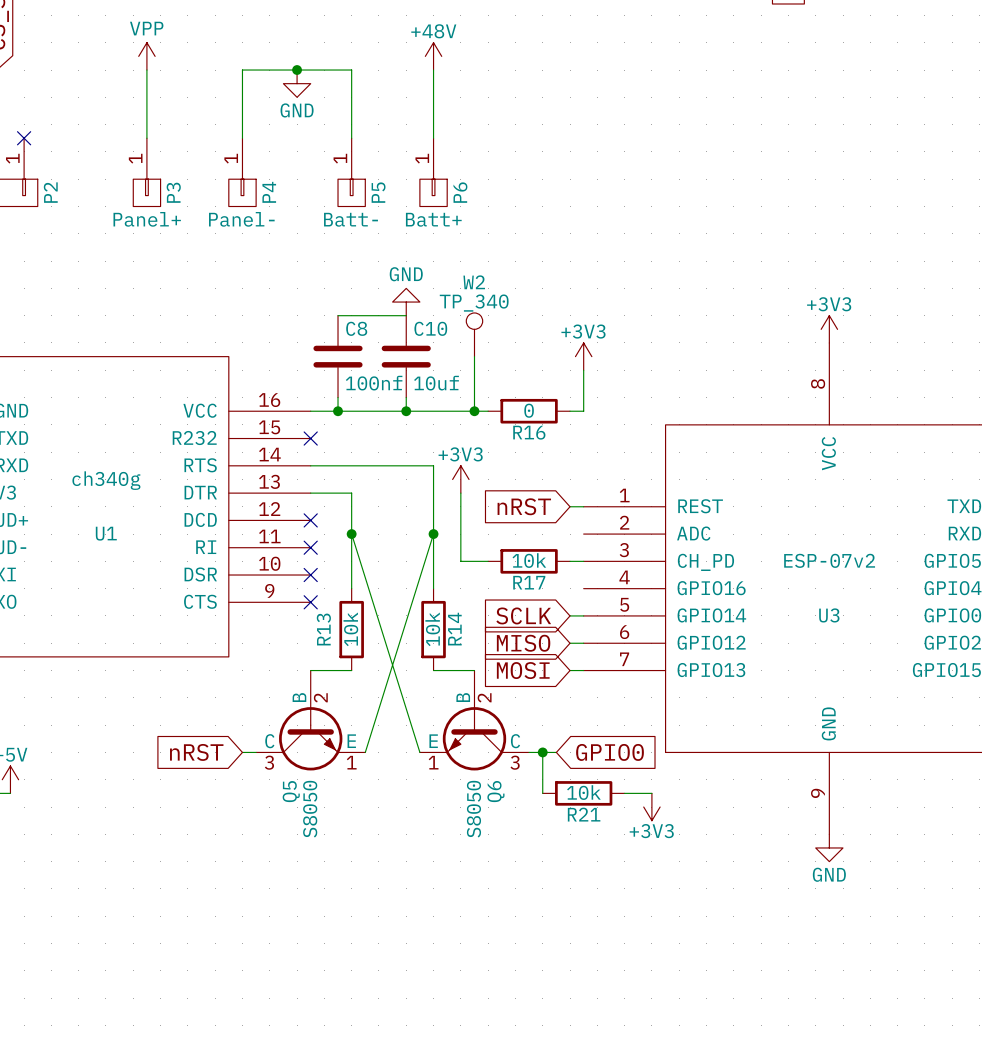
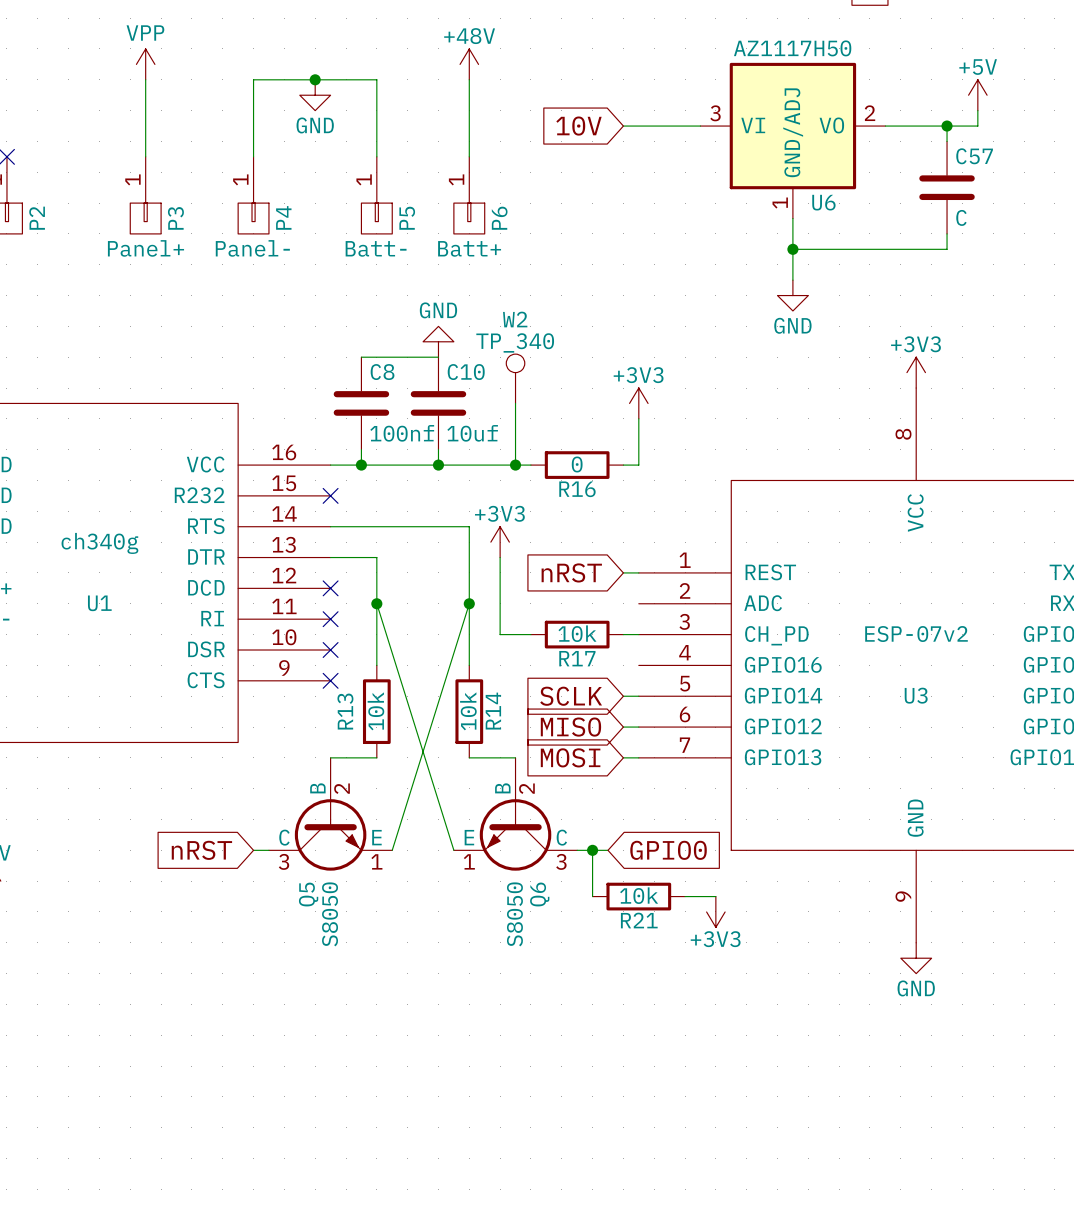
power symbol: none -> +5V (977, 95)
wire: none -> (977, 110) (977, 126) (885, 126)
global label: none -> 10V (578, 126)
wire: none -> (623, 126) (700, 126)
wire: none -> (947, 126) (947, 141)
junction: none -> (947, 126)
U6: none -> AZ1117H50 (792, 140)
C57: none -> C (947, 187)
wire: none -> (792, 218) (792, 280)
wire: none -> (947, 233) (947, 249) (792, 249)
junction: none -> (792, 249)
power symbol: none -> GND (792, 295)

